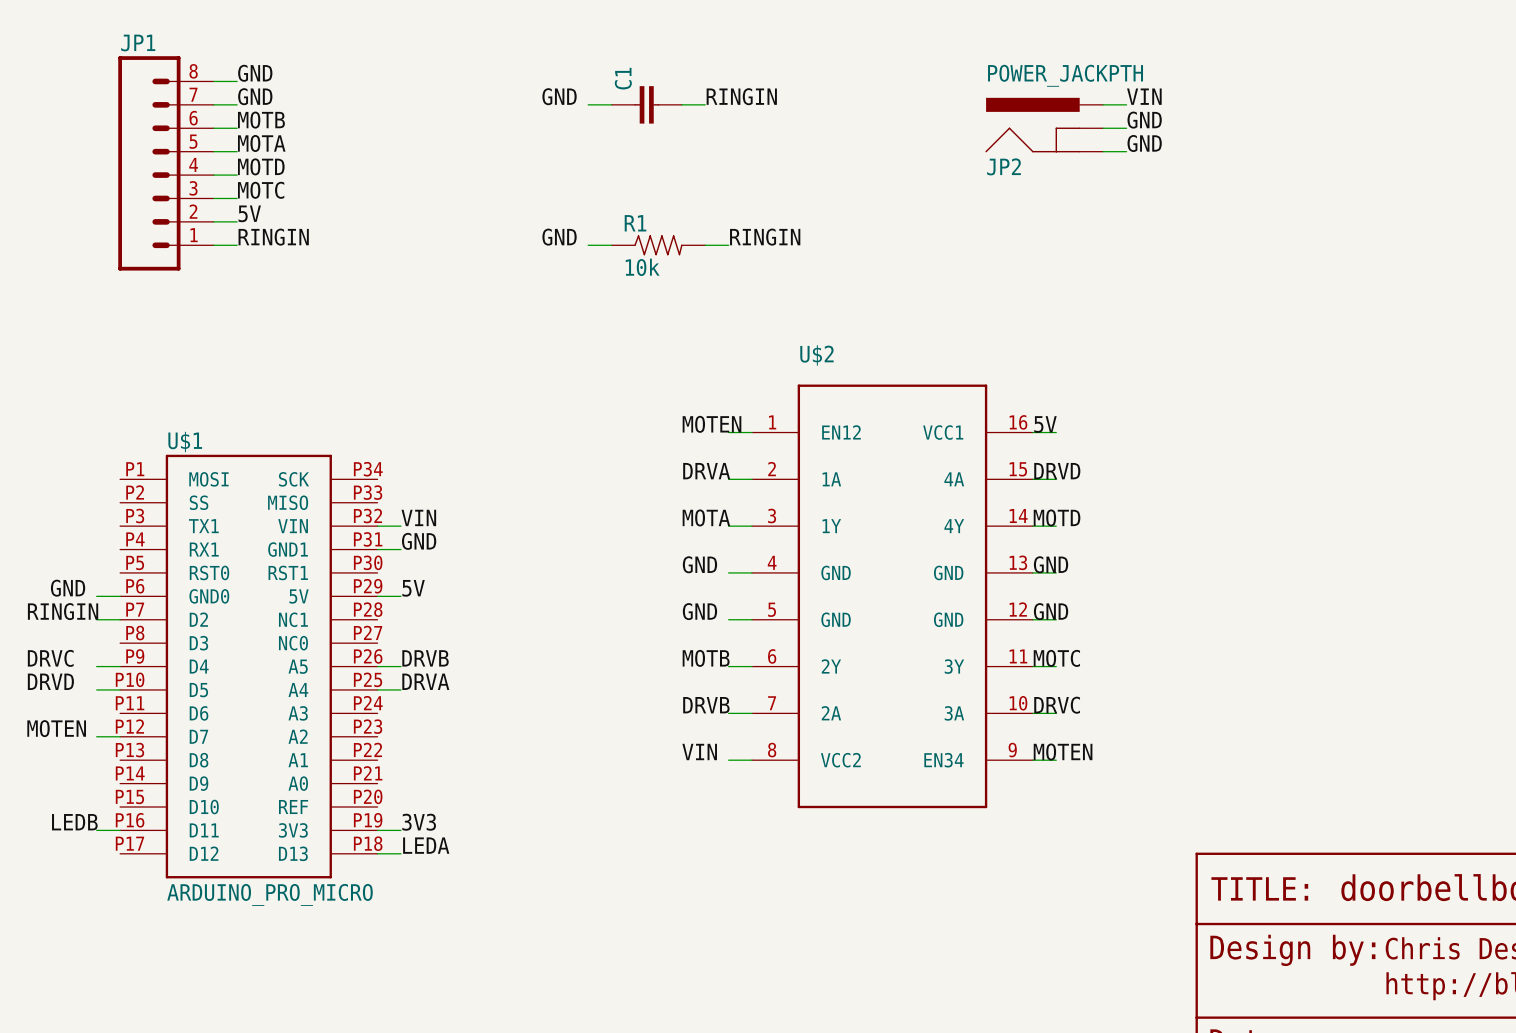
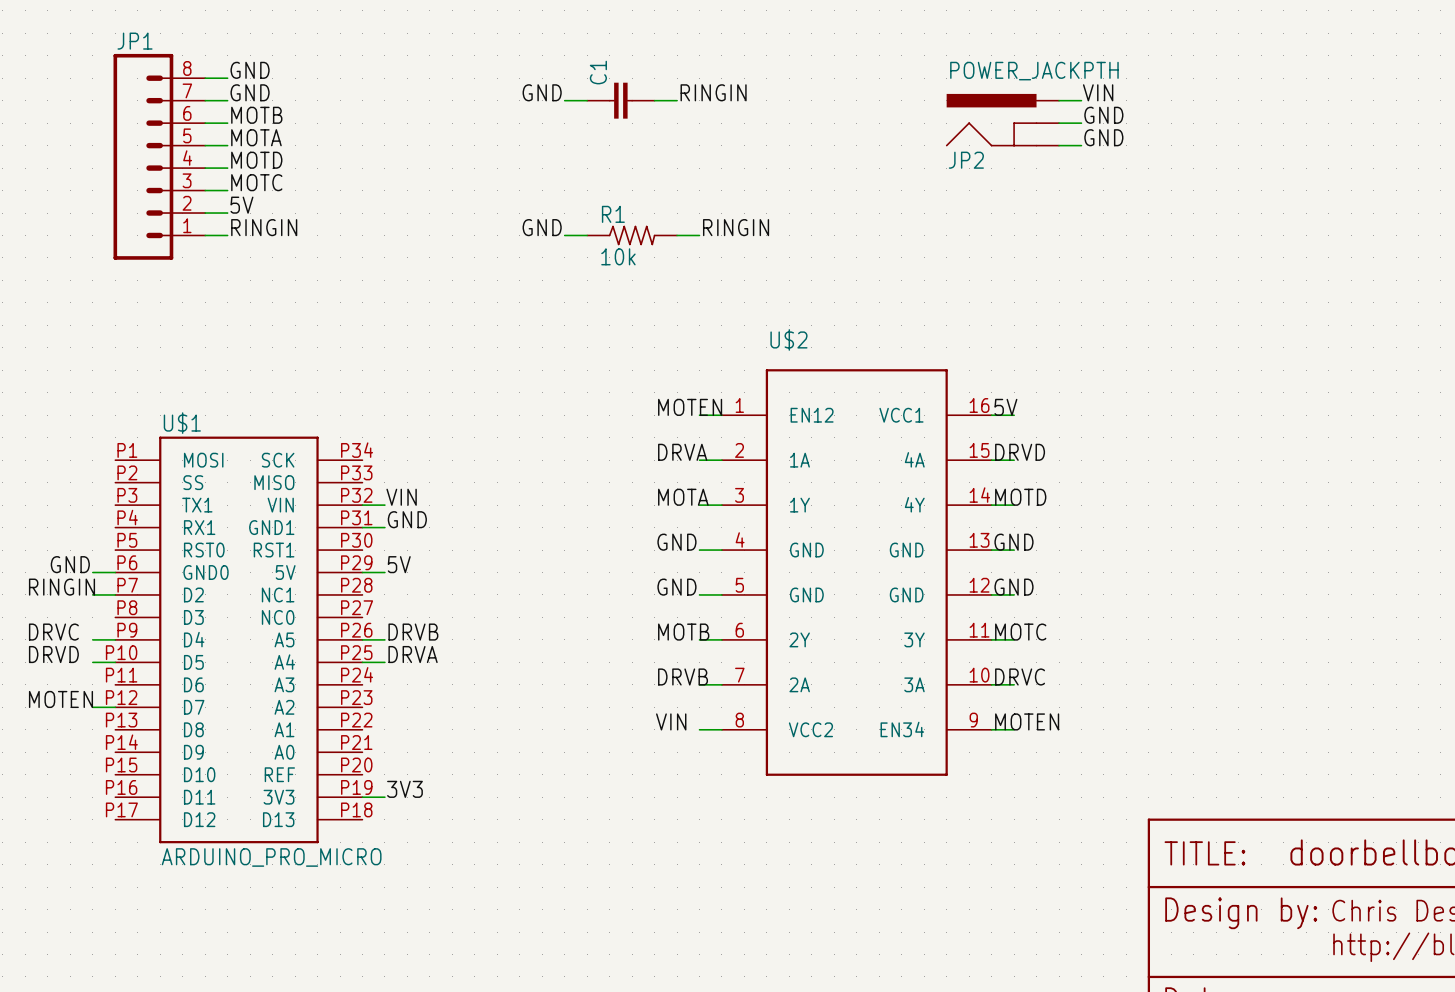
label: LEDB (74, 822) -> none
wire: (96, 830) (120, 830) -> none
label: LEDA (426, 845) -> none
wire: (377, 853) (400, 853) -> none

